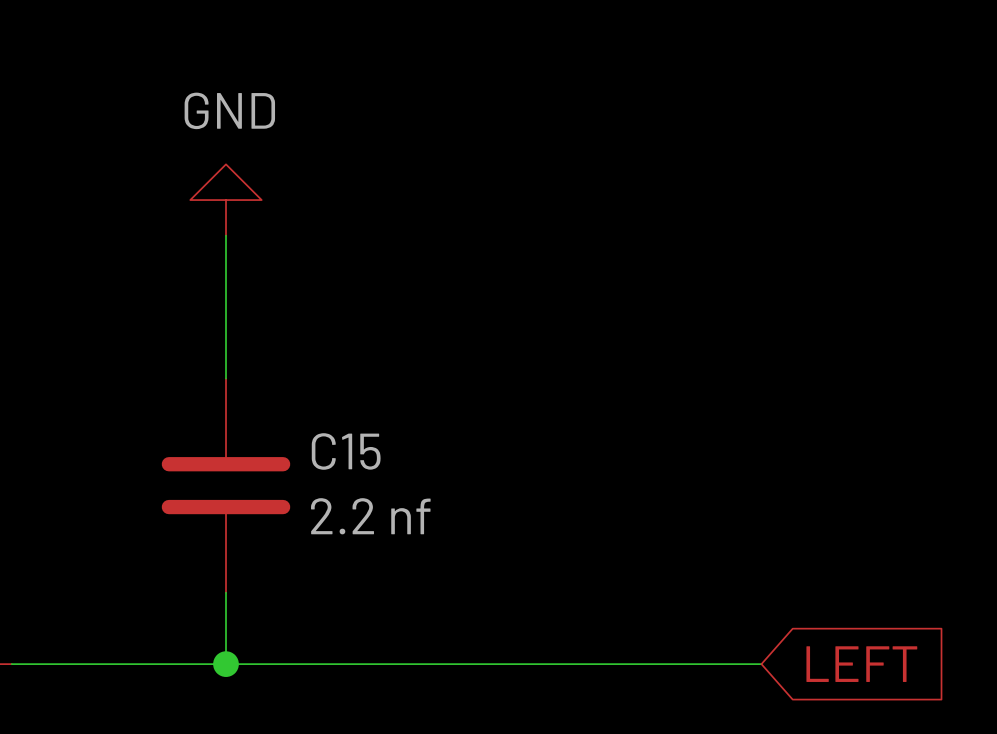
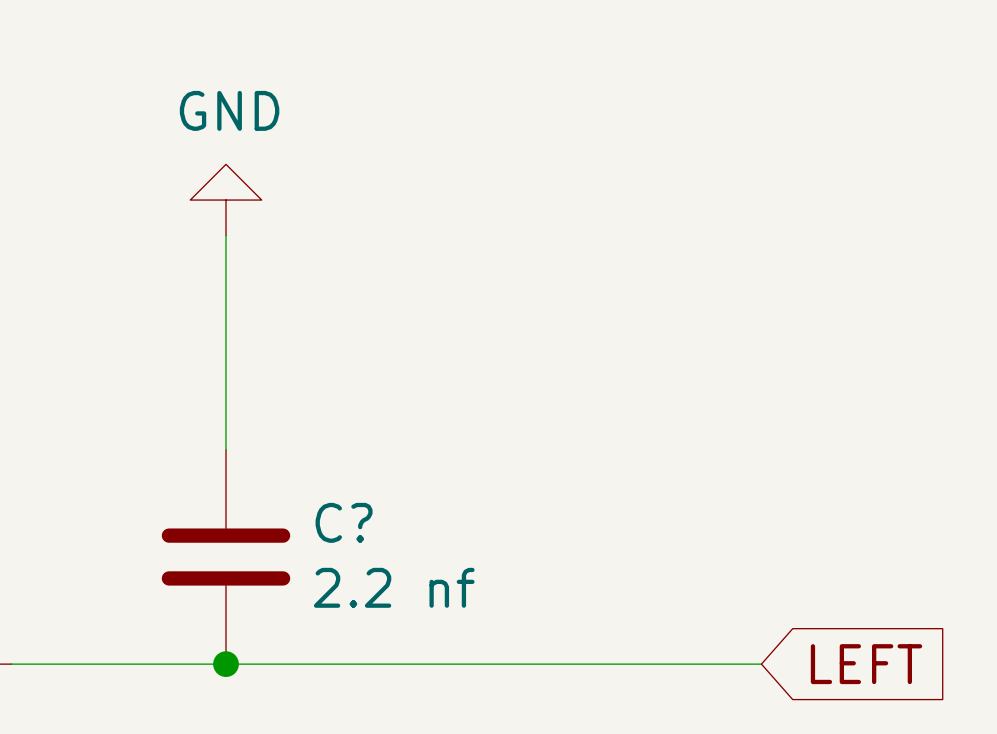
C15: 2.2 nf (226, 485) -> none
C?: none -> 2.2 nf (226, 557)

